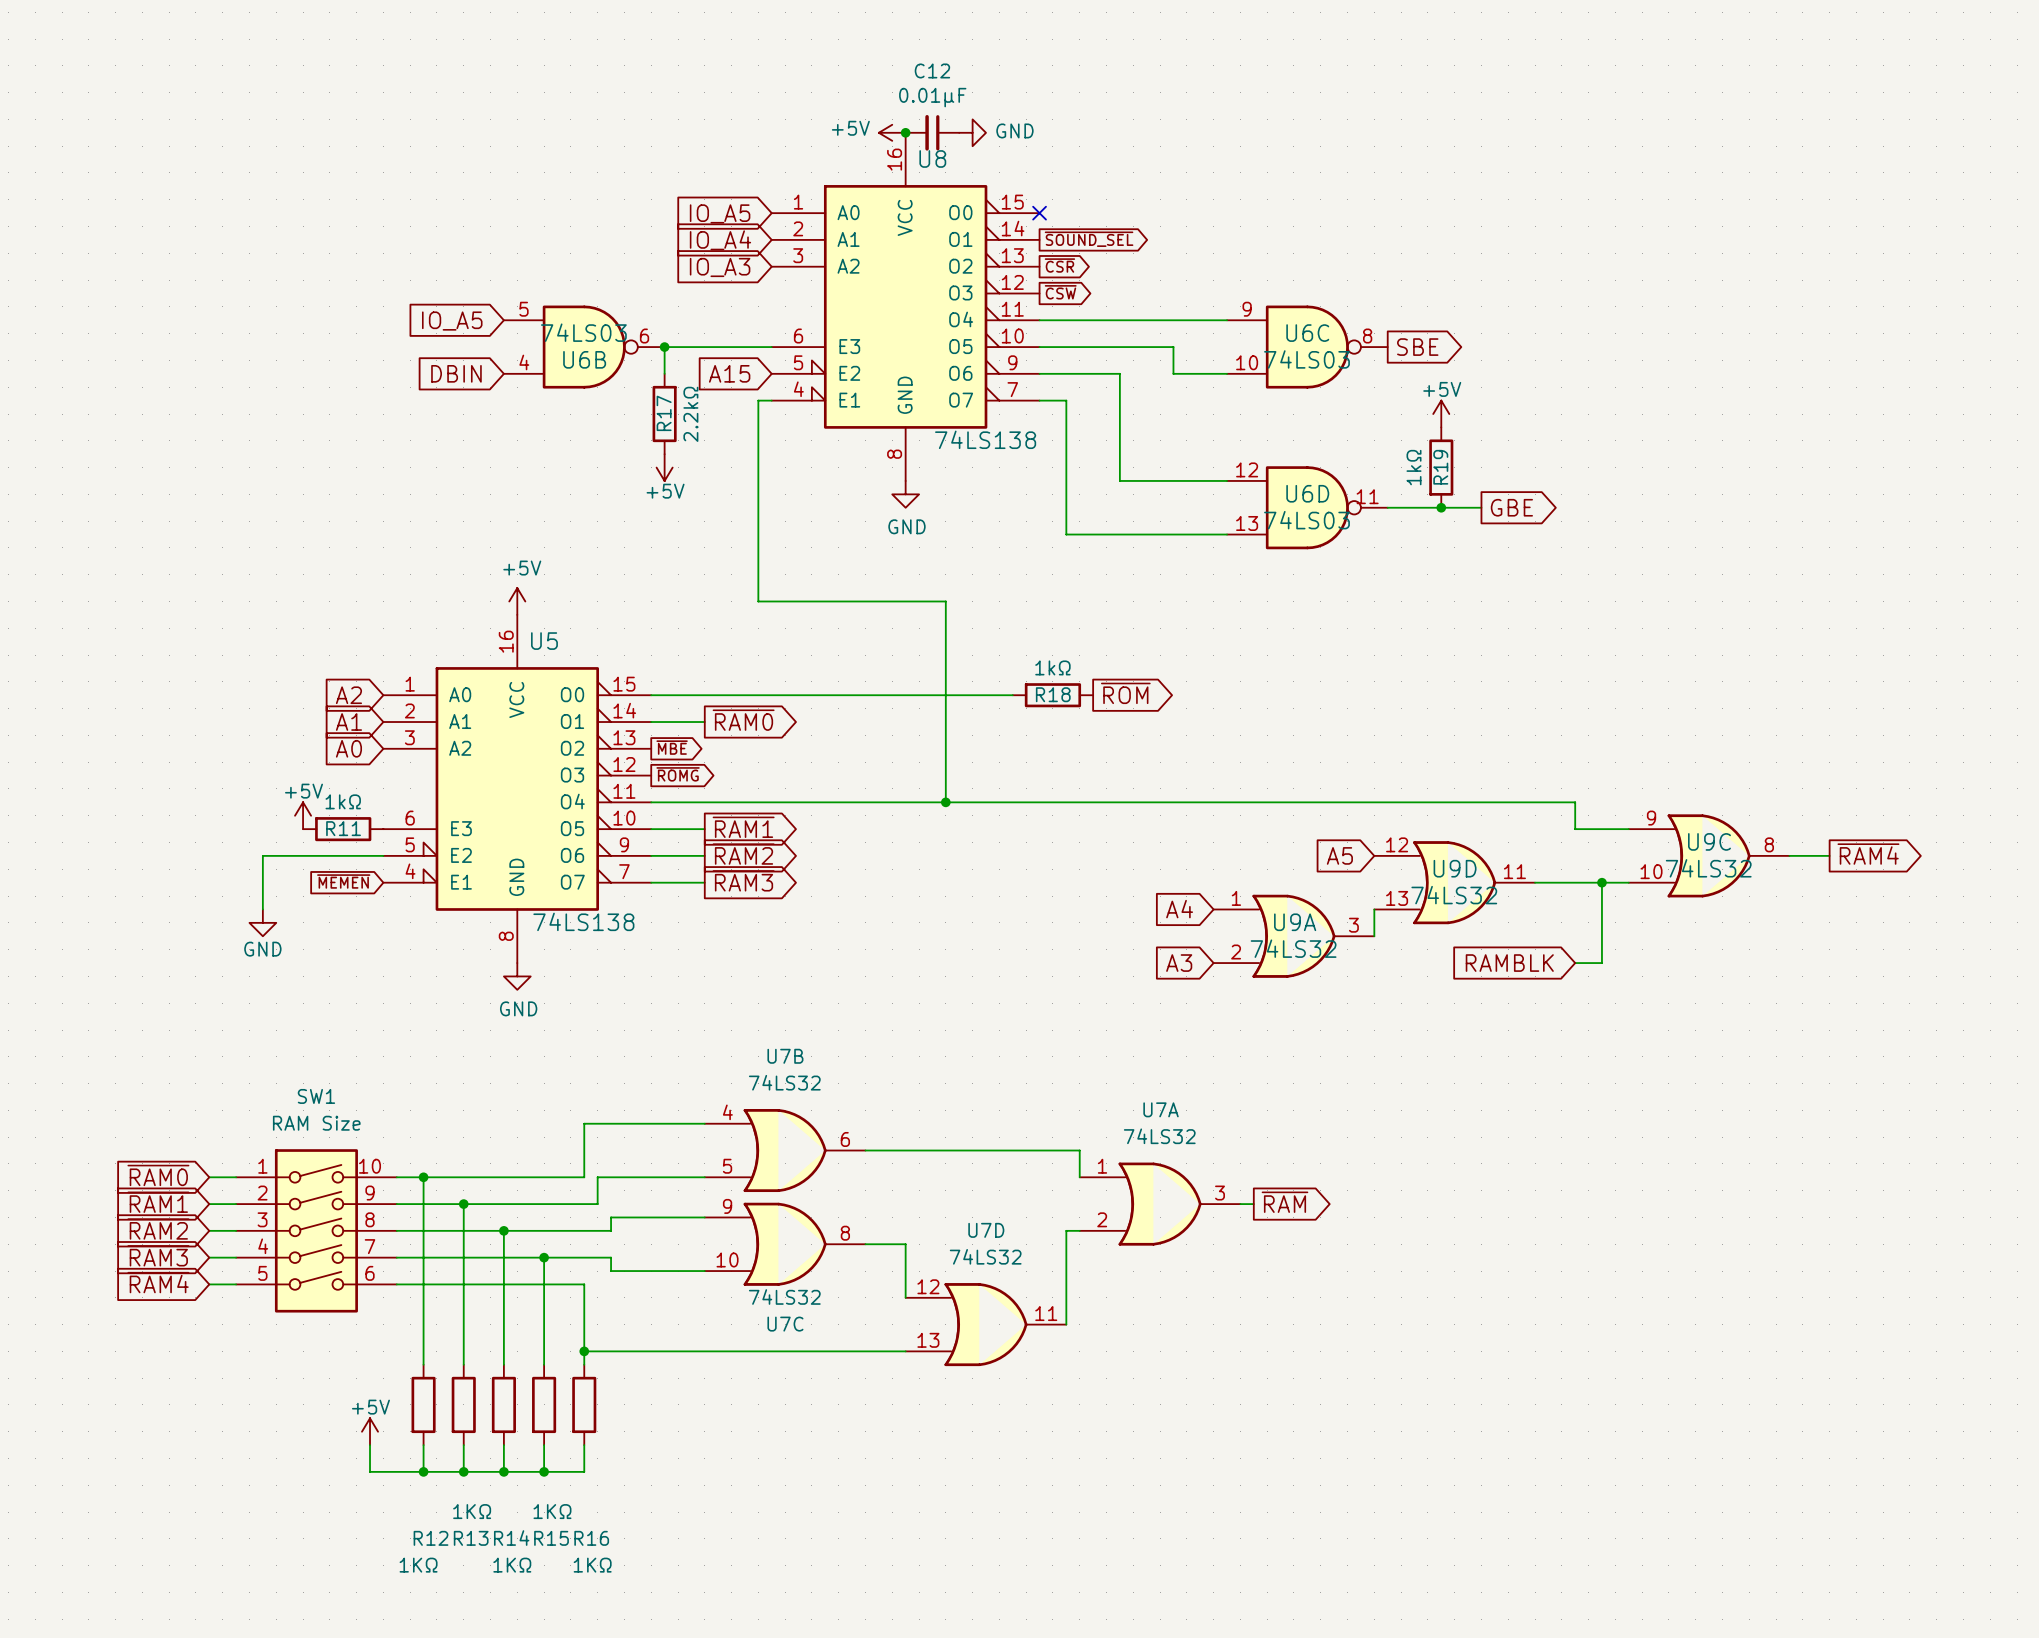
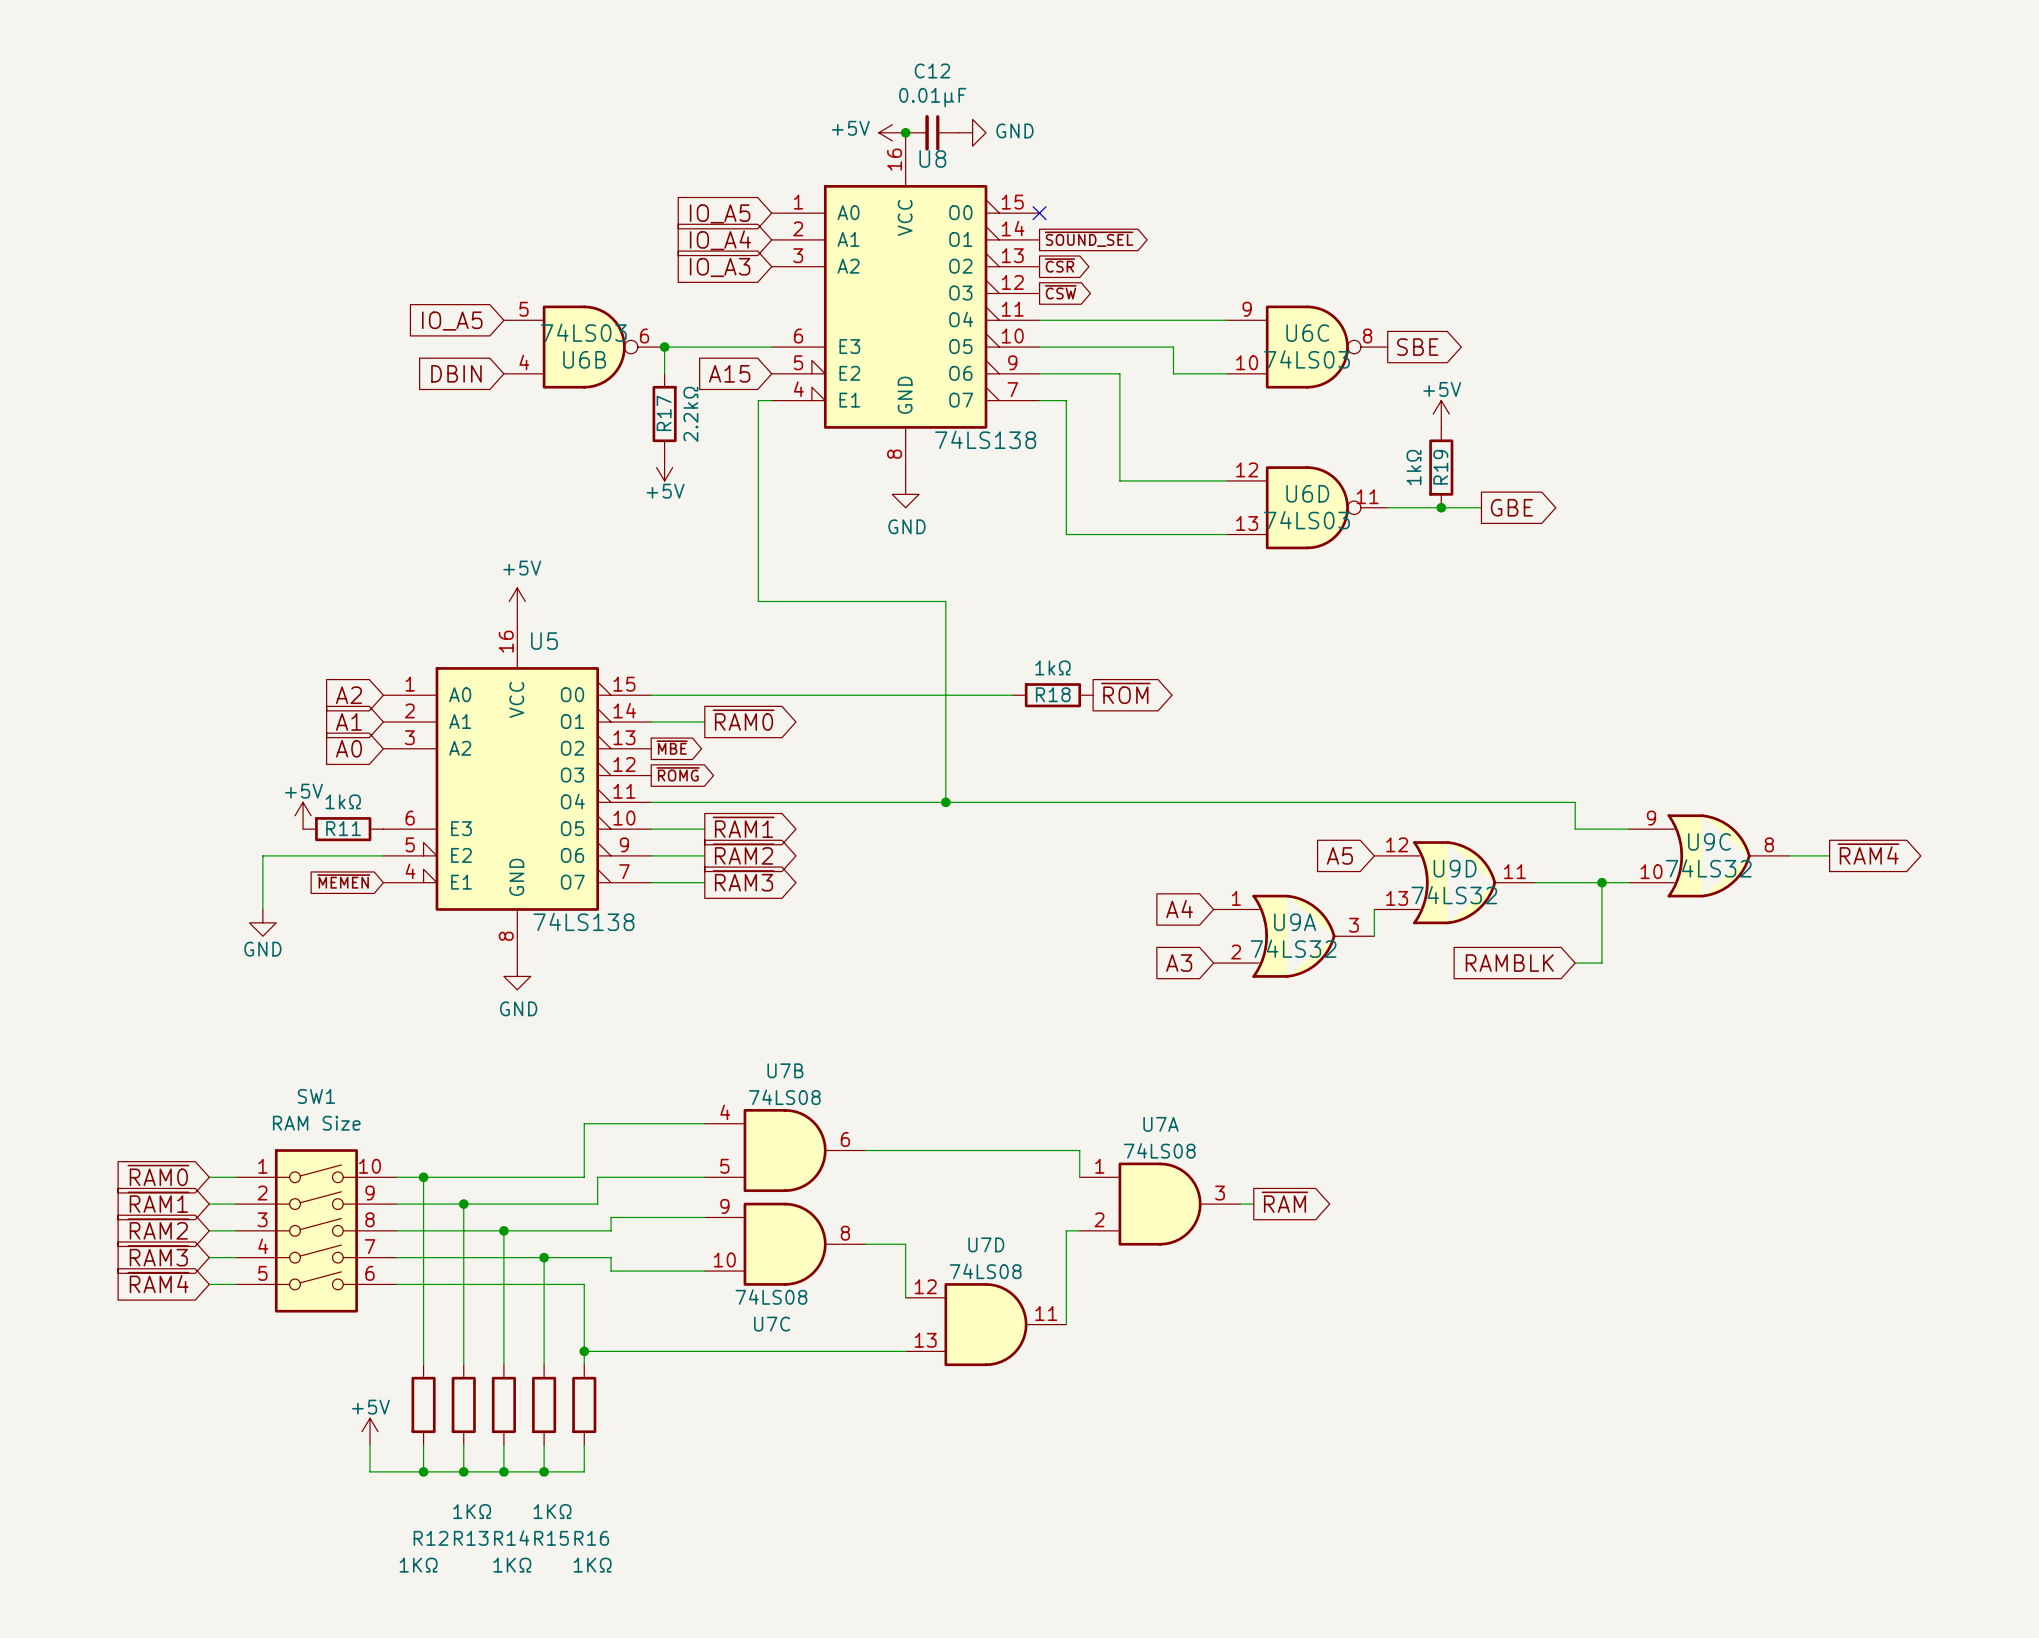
U7B value: 74LS32 (784, 1082) -> 74LS08 (784, 1097)
U7B symbol: [704, 1109, 866, 1193] -> [704, 1109, 866, 1193]
U7A value: 74LS32 (1159, 1136) -> 74LS08 (1159, 1150)
U7A symbol: [1079, 1162, 1241, 1246] -> [1079, 1162, 1241, 1246]
U7C symbol: [704, 1202, 866, 1286] -> [704, 1202, 866, 1286]
U7D value: 74LS32 (985, 1256) -> 74LS08 (985, 1271)
U7D symbol: [905, 1283, 1067, 1367] -> [905, 1283, 1067, 1367]
U7C value: 74LS32 (784, 1297) -> 74LS08 (771, 1297)

